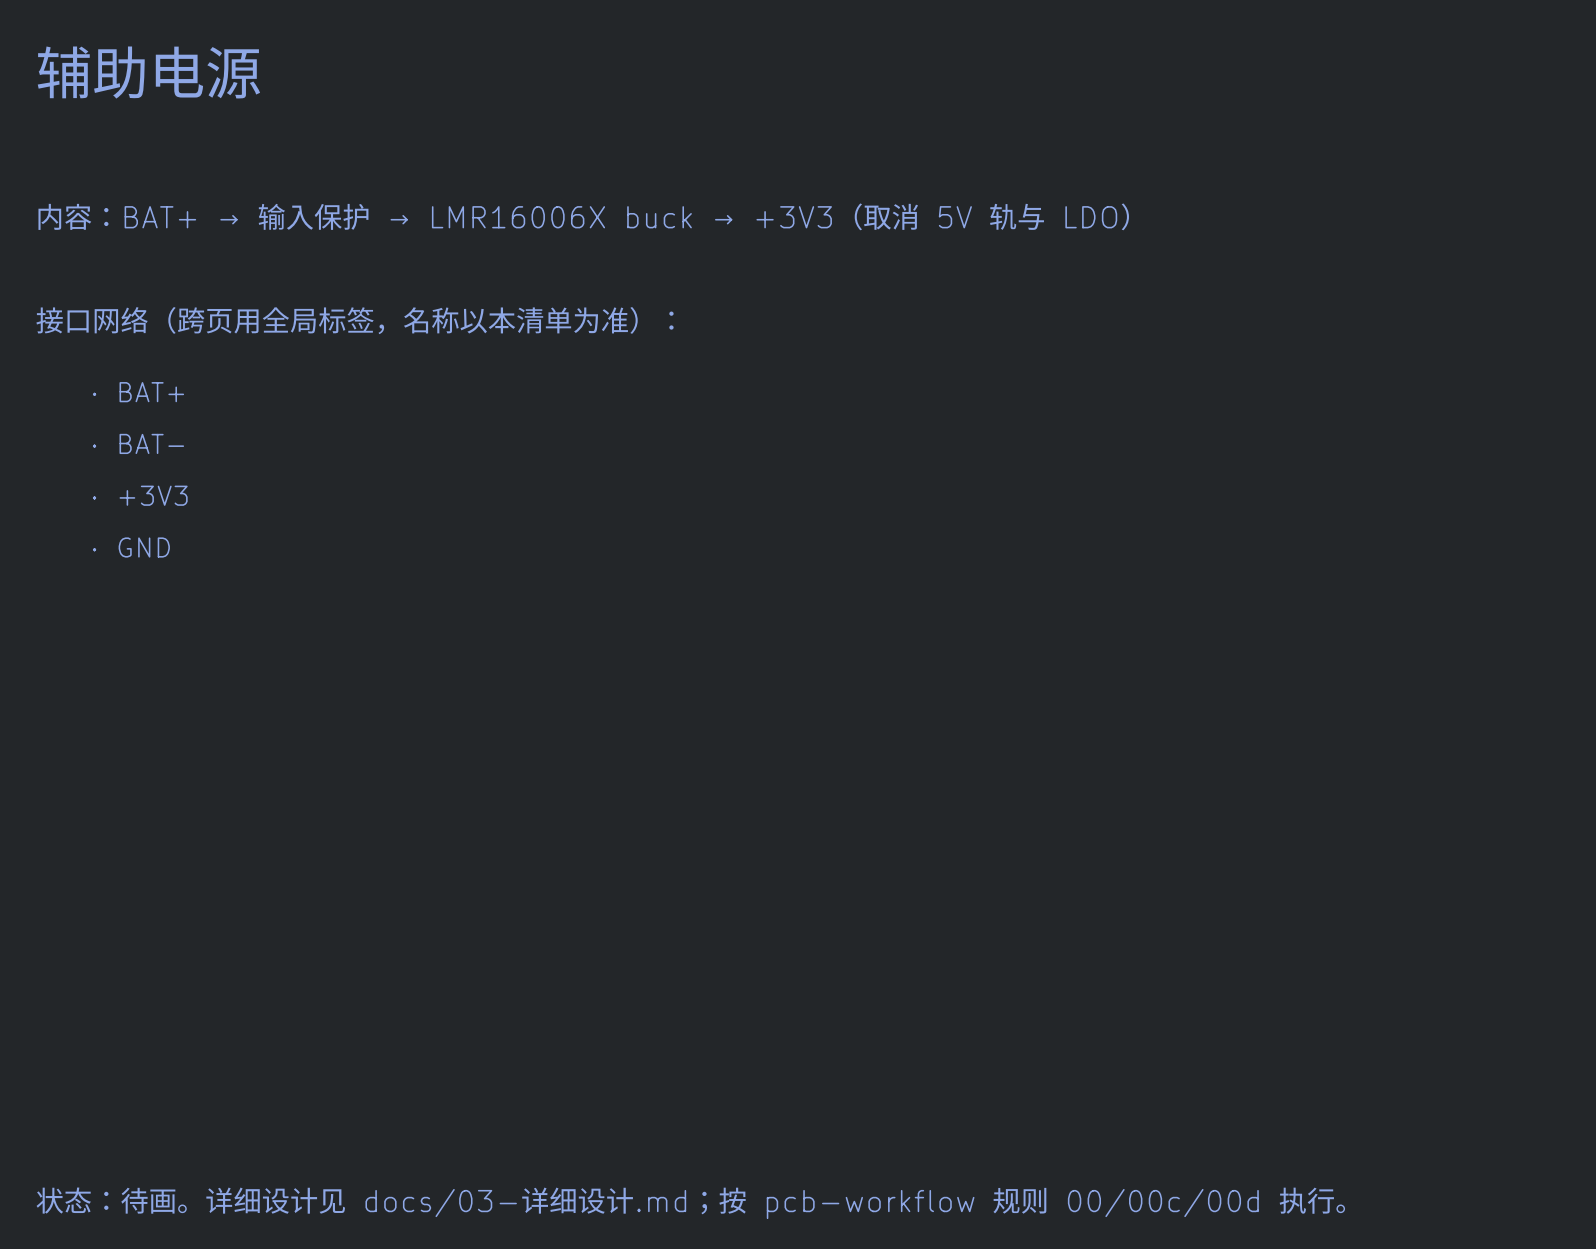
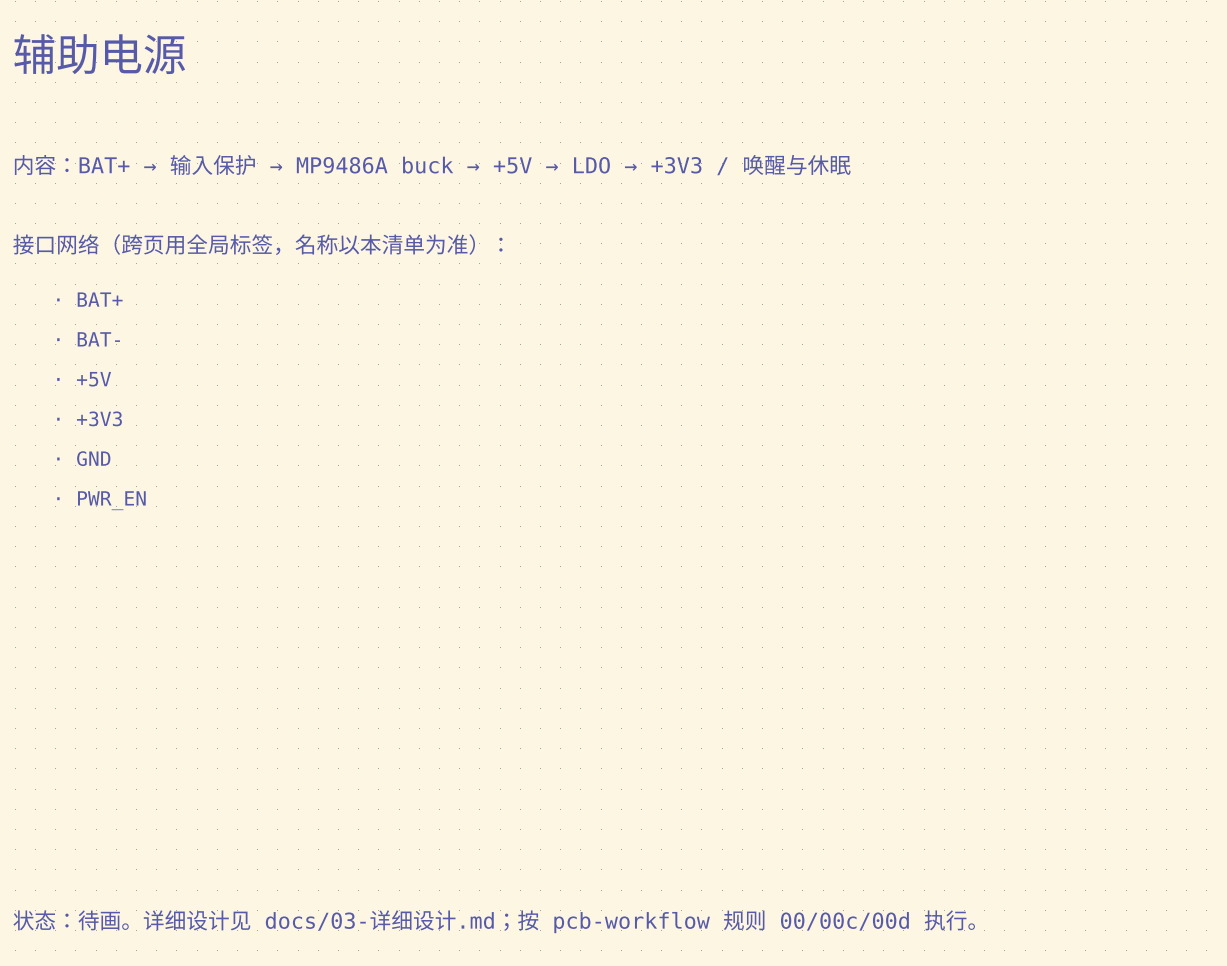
text: 内容：BAT+ → 输入保护 → LMR16006X buck → +3V3（取消 5V 轨与 LDO） (583, 216) -> 内容：BAT+ → 输入保护 → MP9486A buck → +5V → LDO → +3V3 / 唤醒与休眠 (432, 165)
text: · +3V3 (140, 495) -> · +5V (84, 379)
text: · GND (131, 547) -> · +3V3 (89, 418)
text: none -> · GND (83, 458)
text: none -> · PWR_EN (101, 500)

